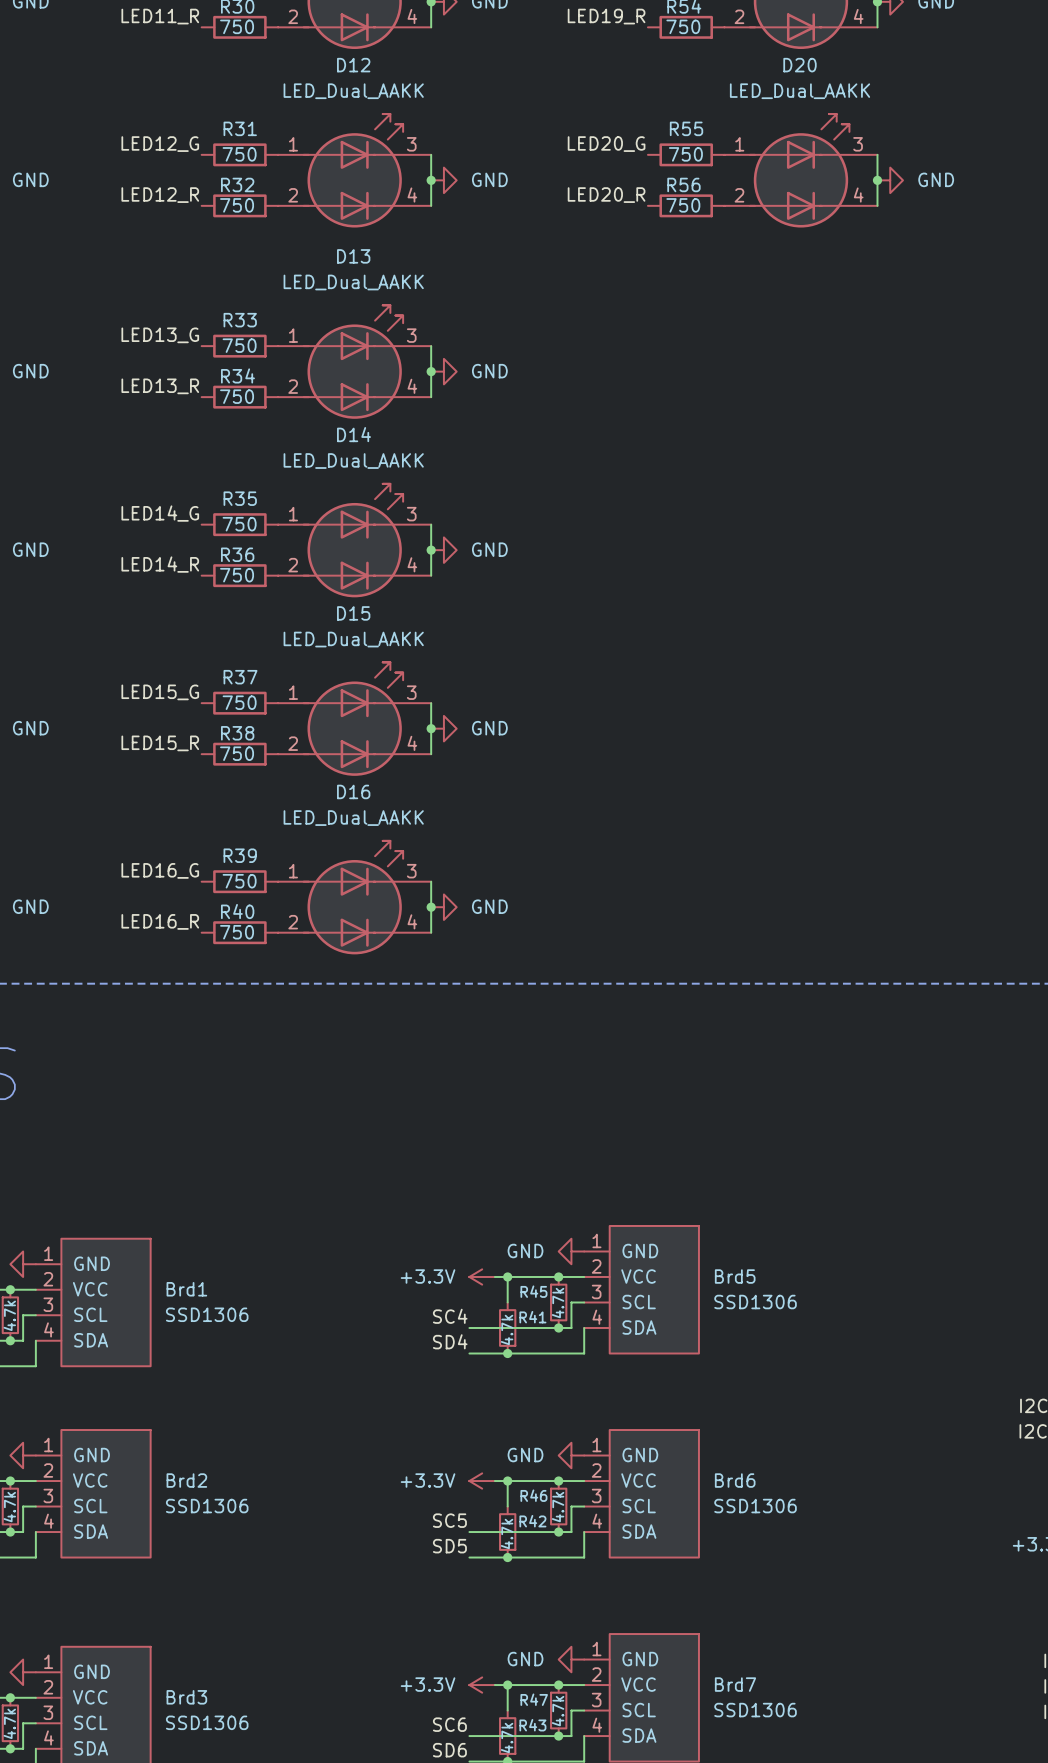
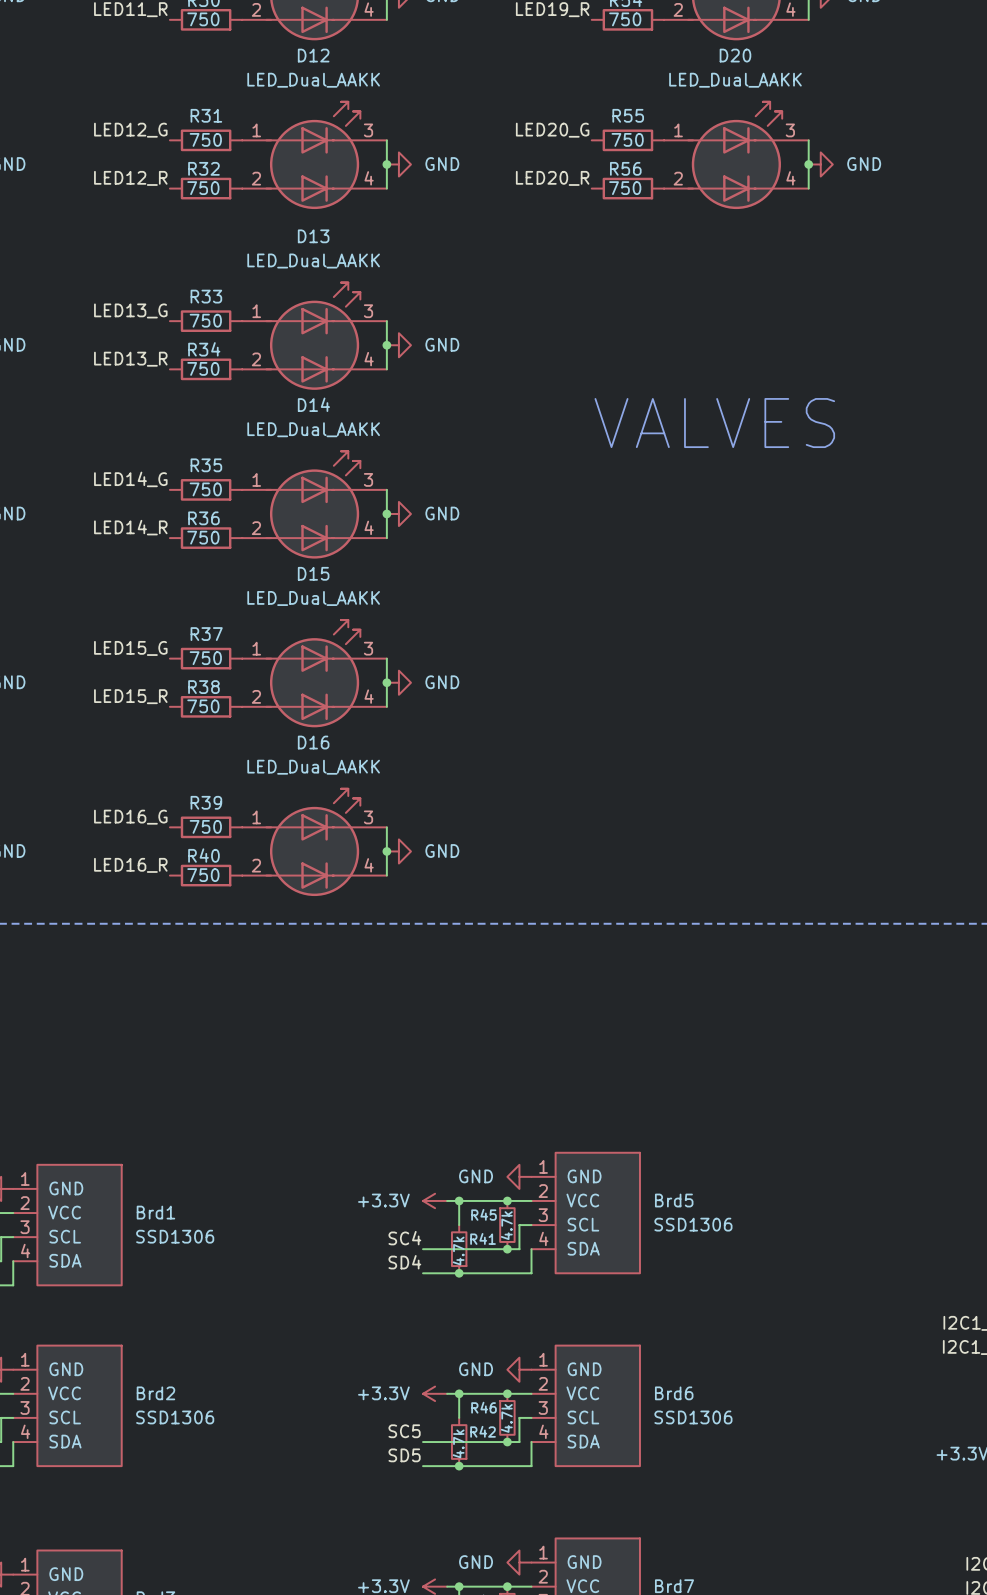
text: none -> VALVES (714, 423)

